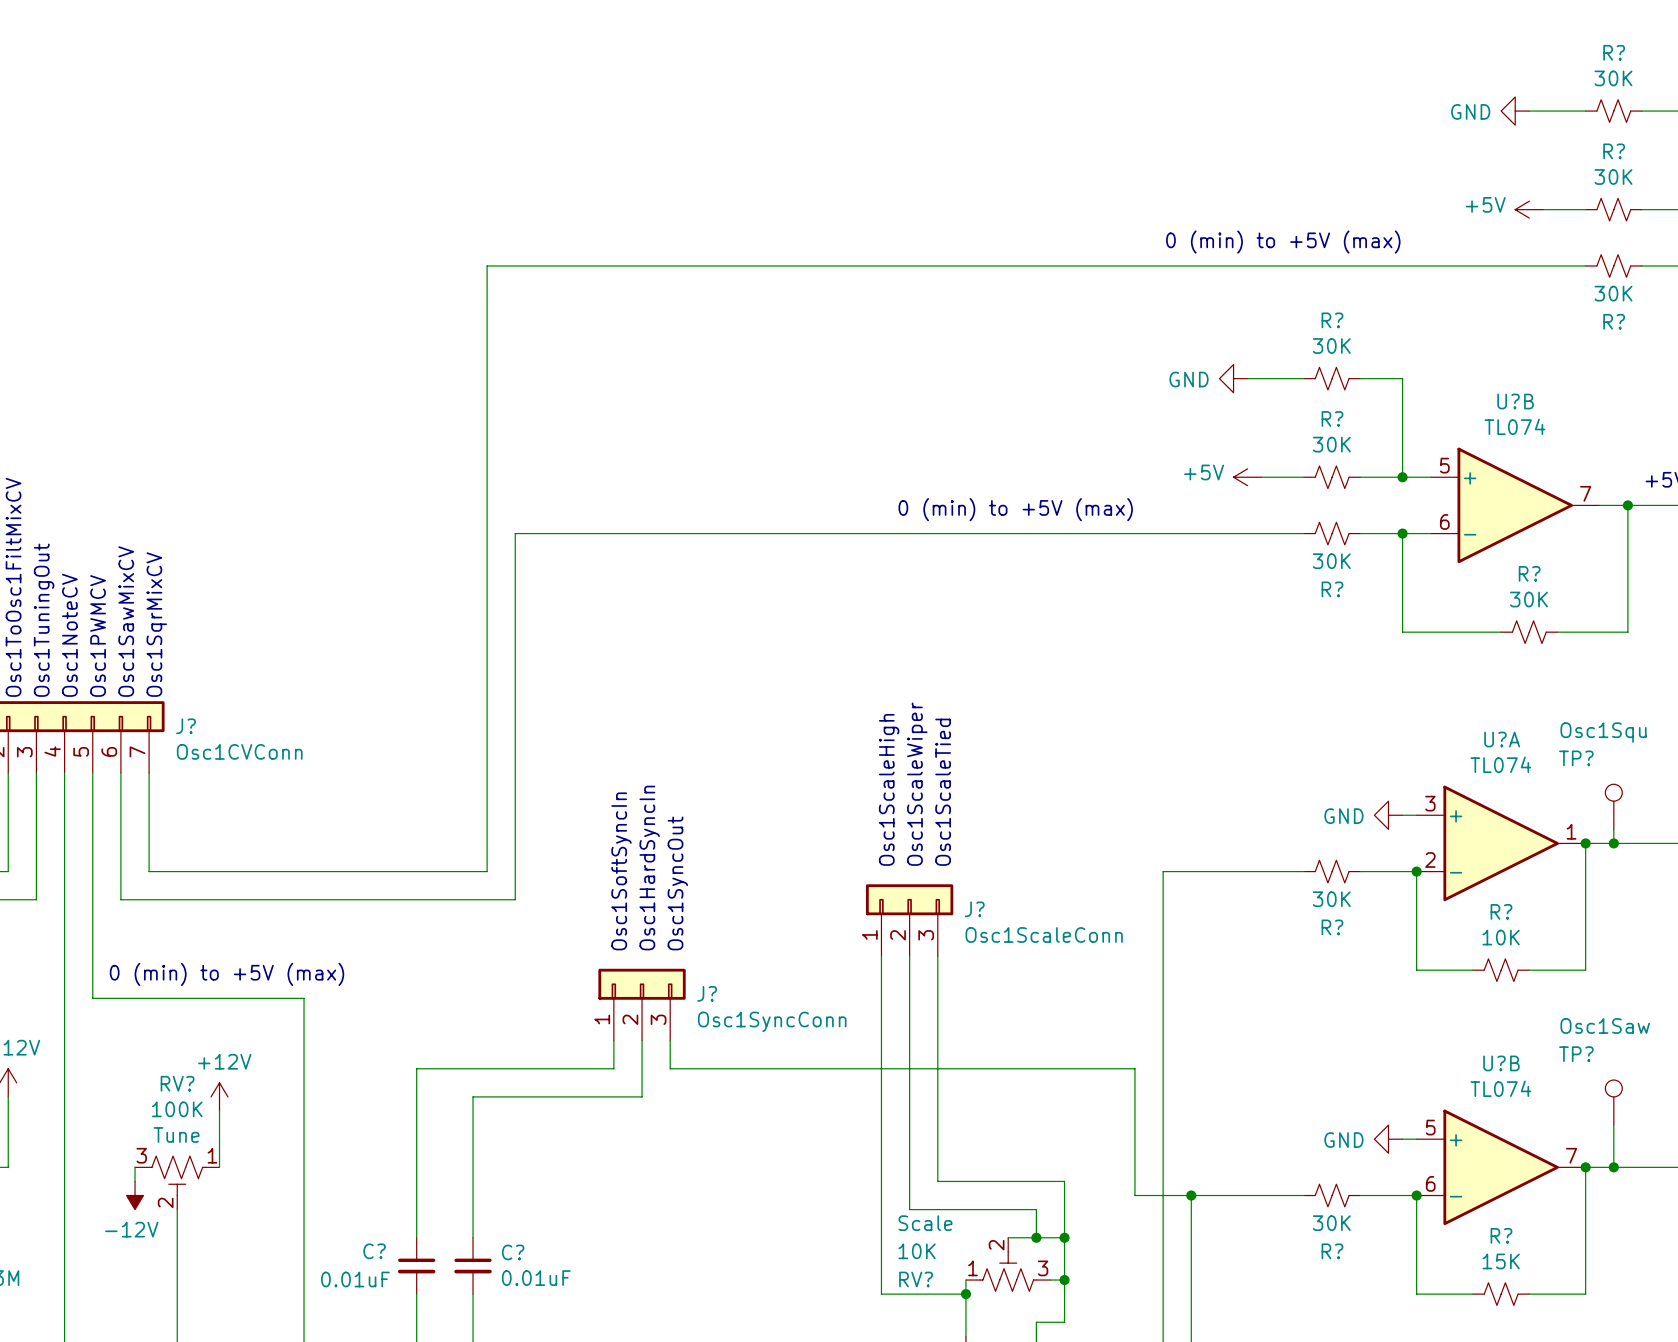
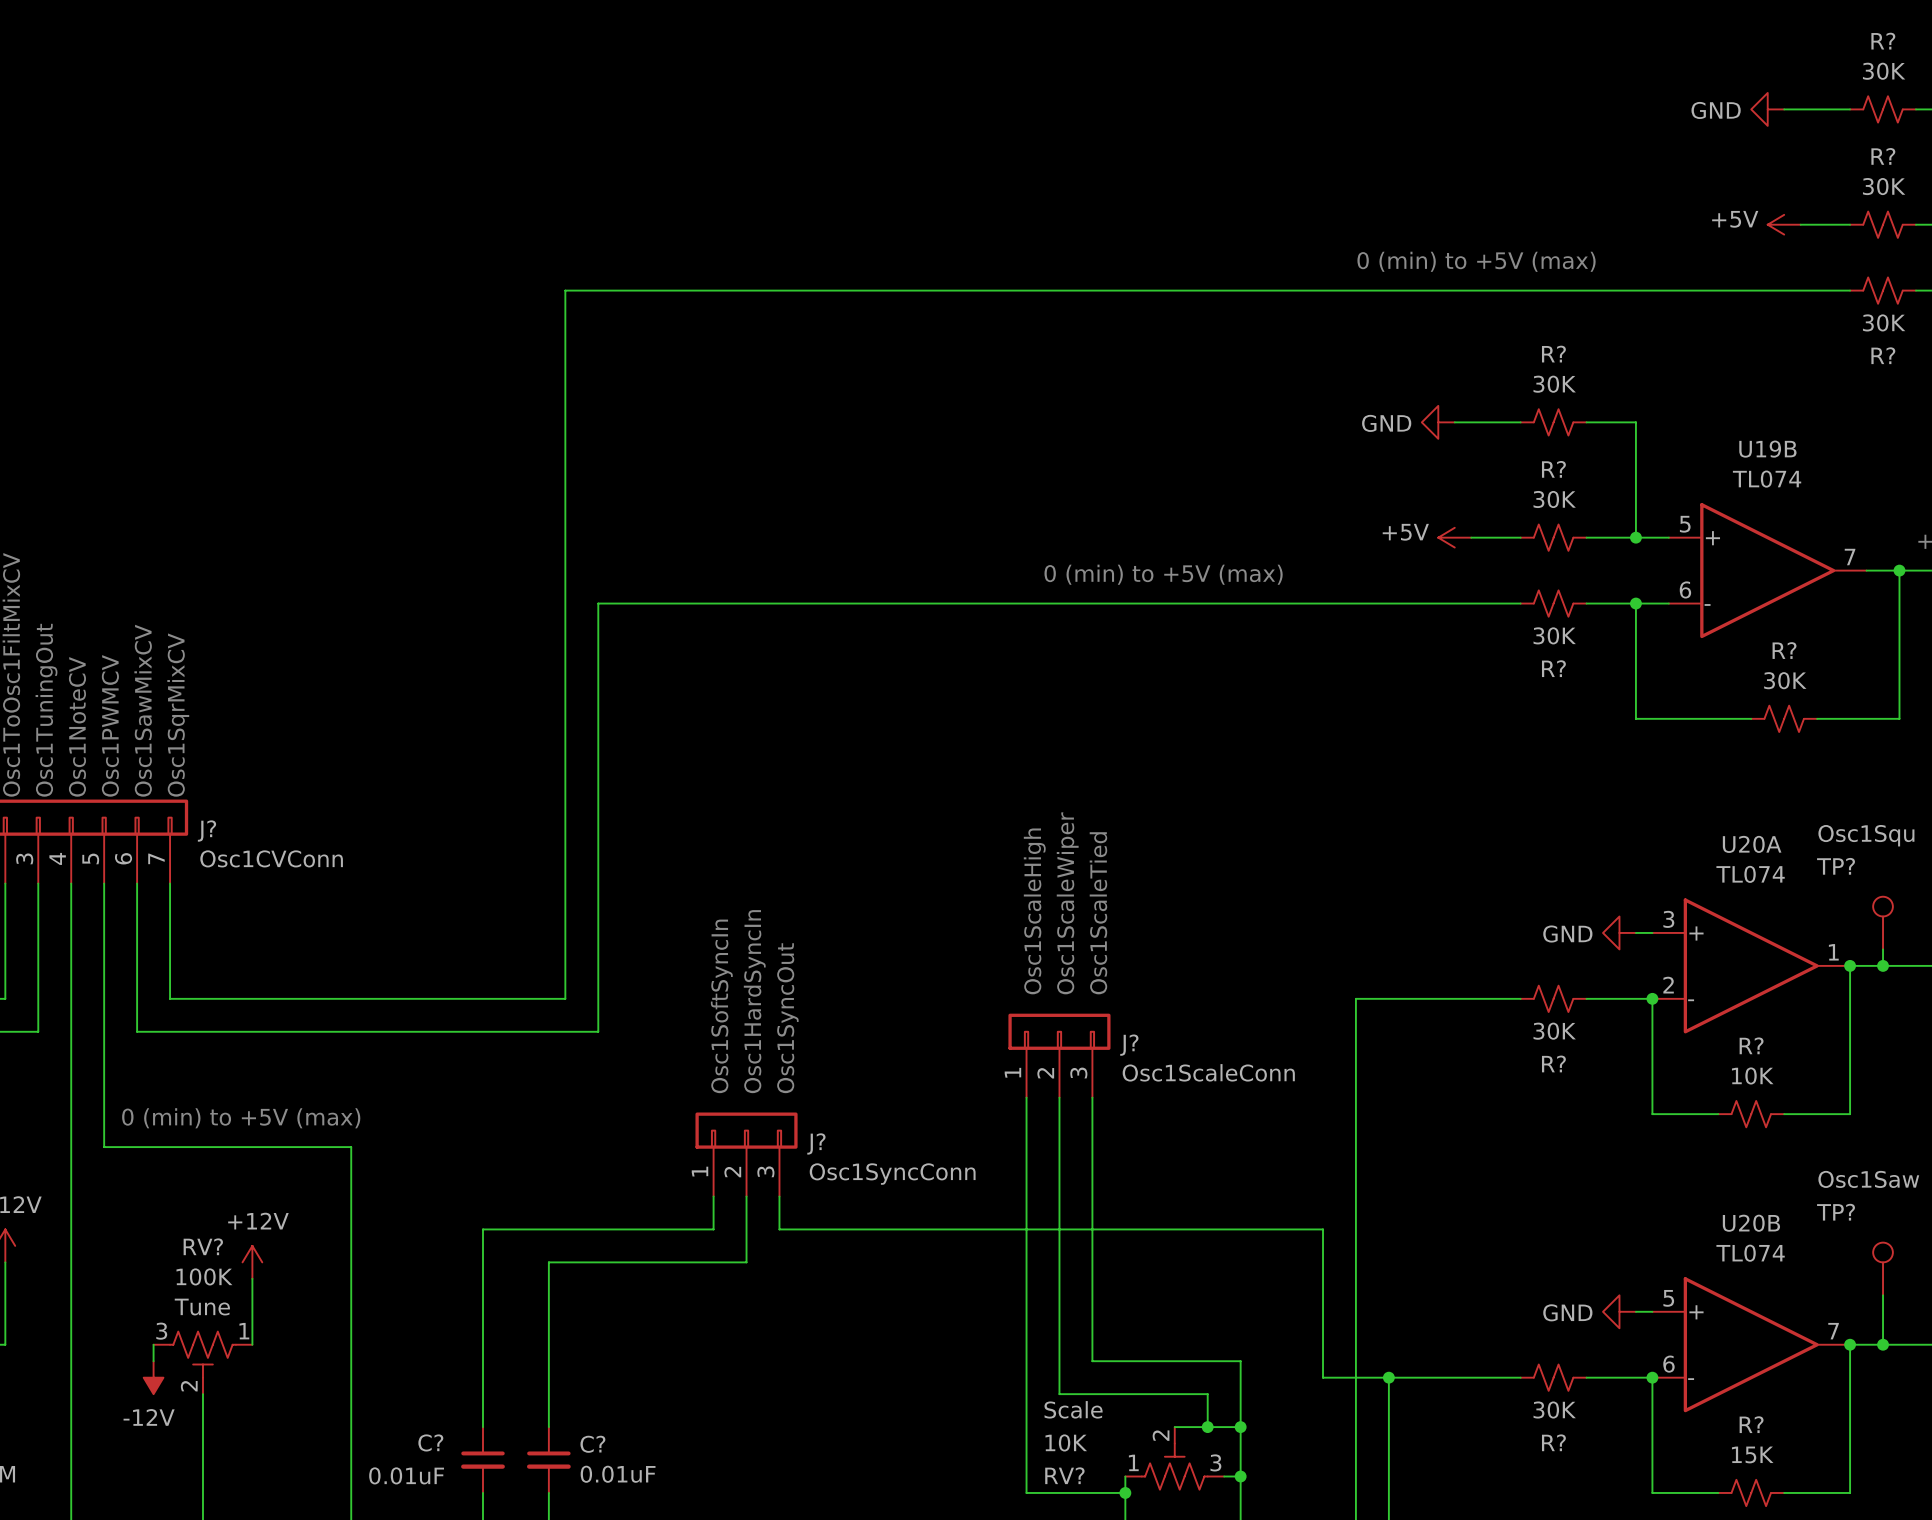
U?B name: U?B (1515, 401) -> U19B (1767, 449)
U?A name: U?A (1502, 739) -> U20A (1752, 844)
U?B name: U?B (1501, 1063) -> U20B (1751, 1223)

